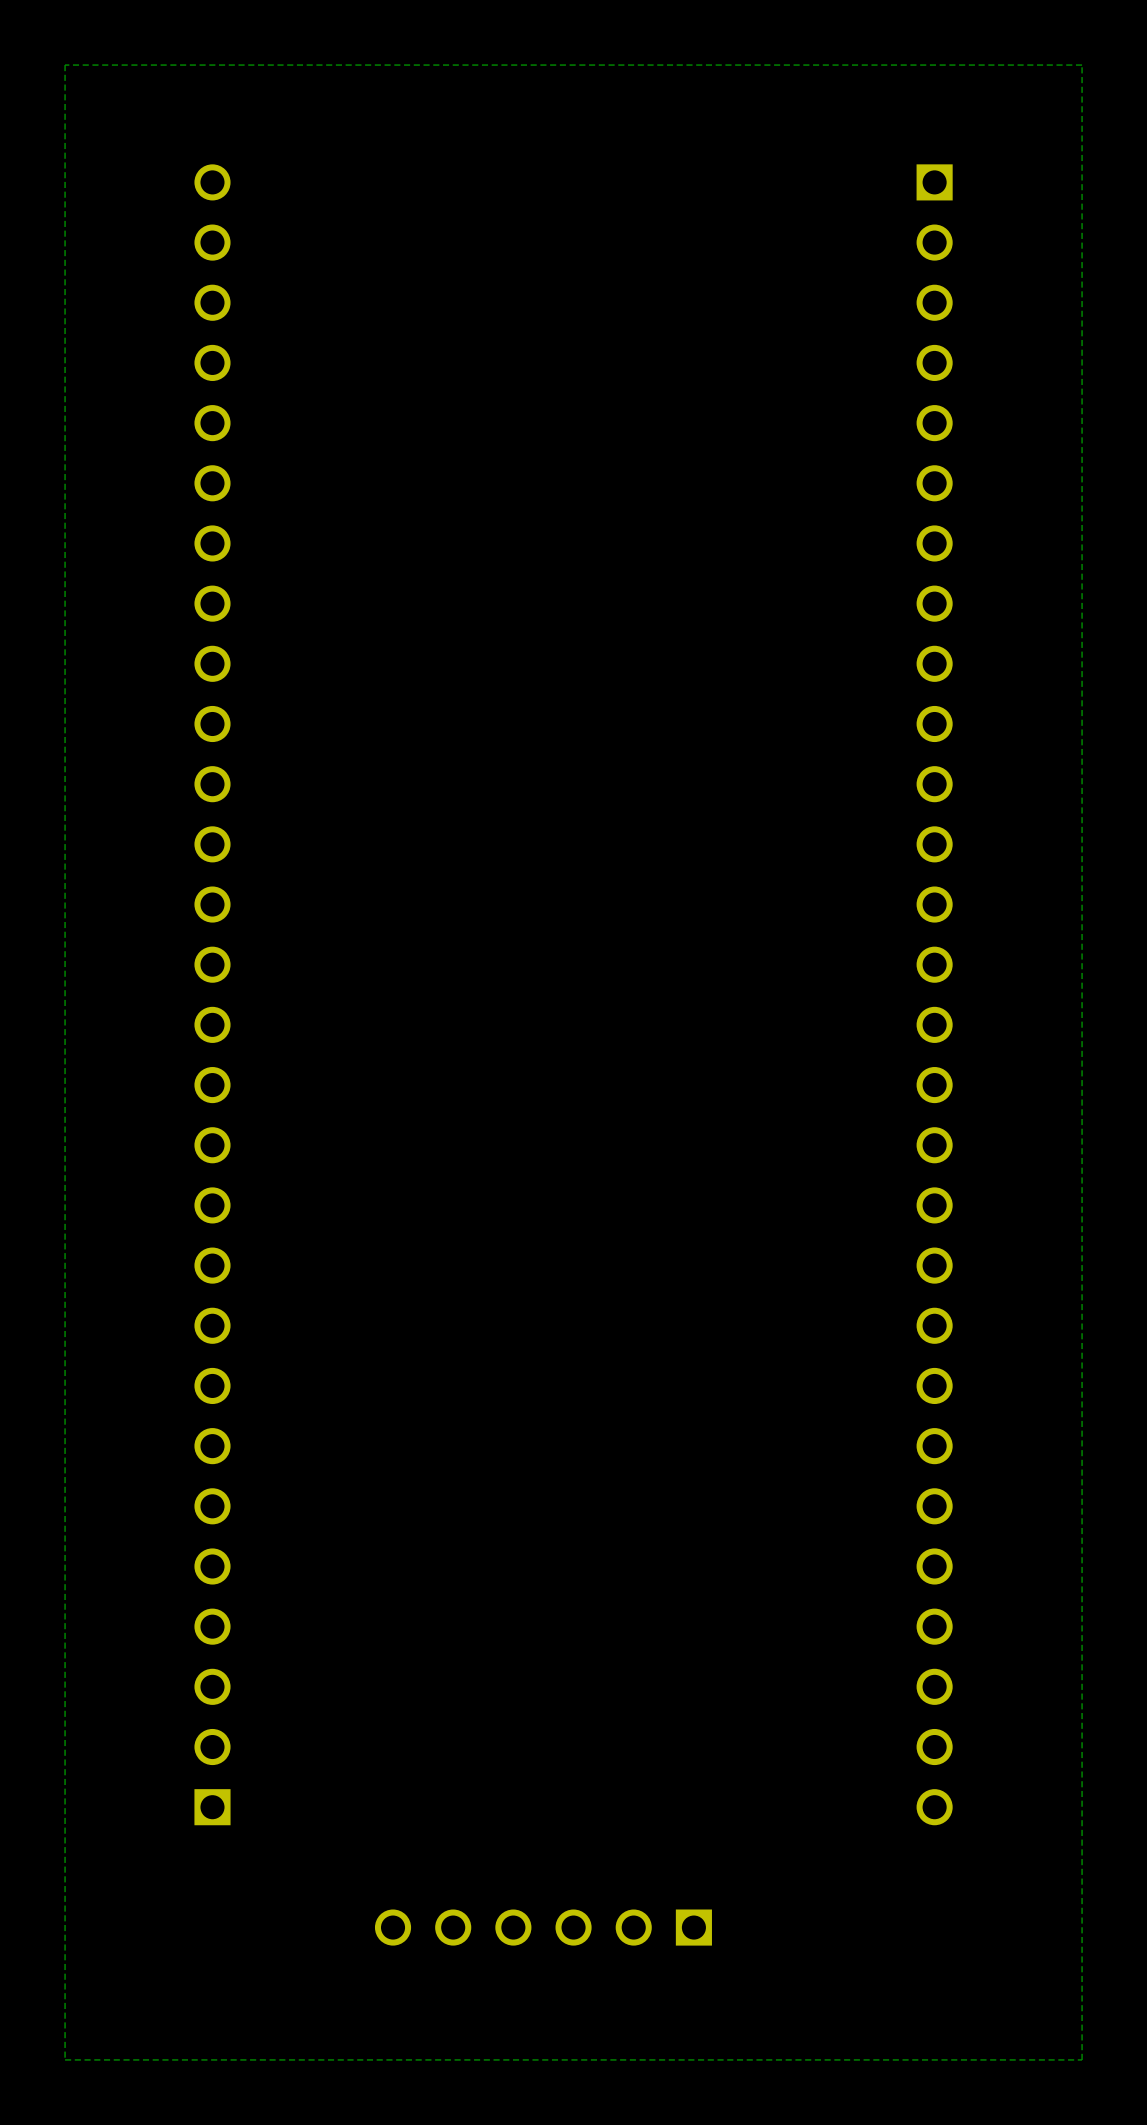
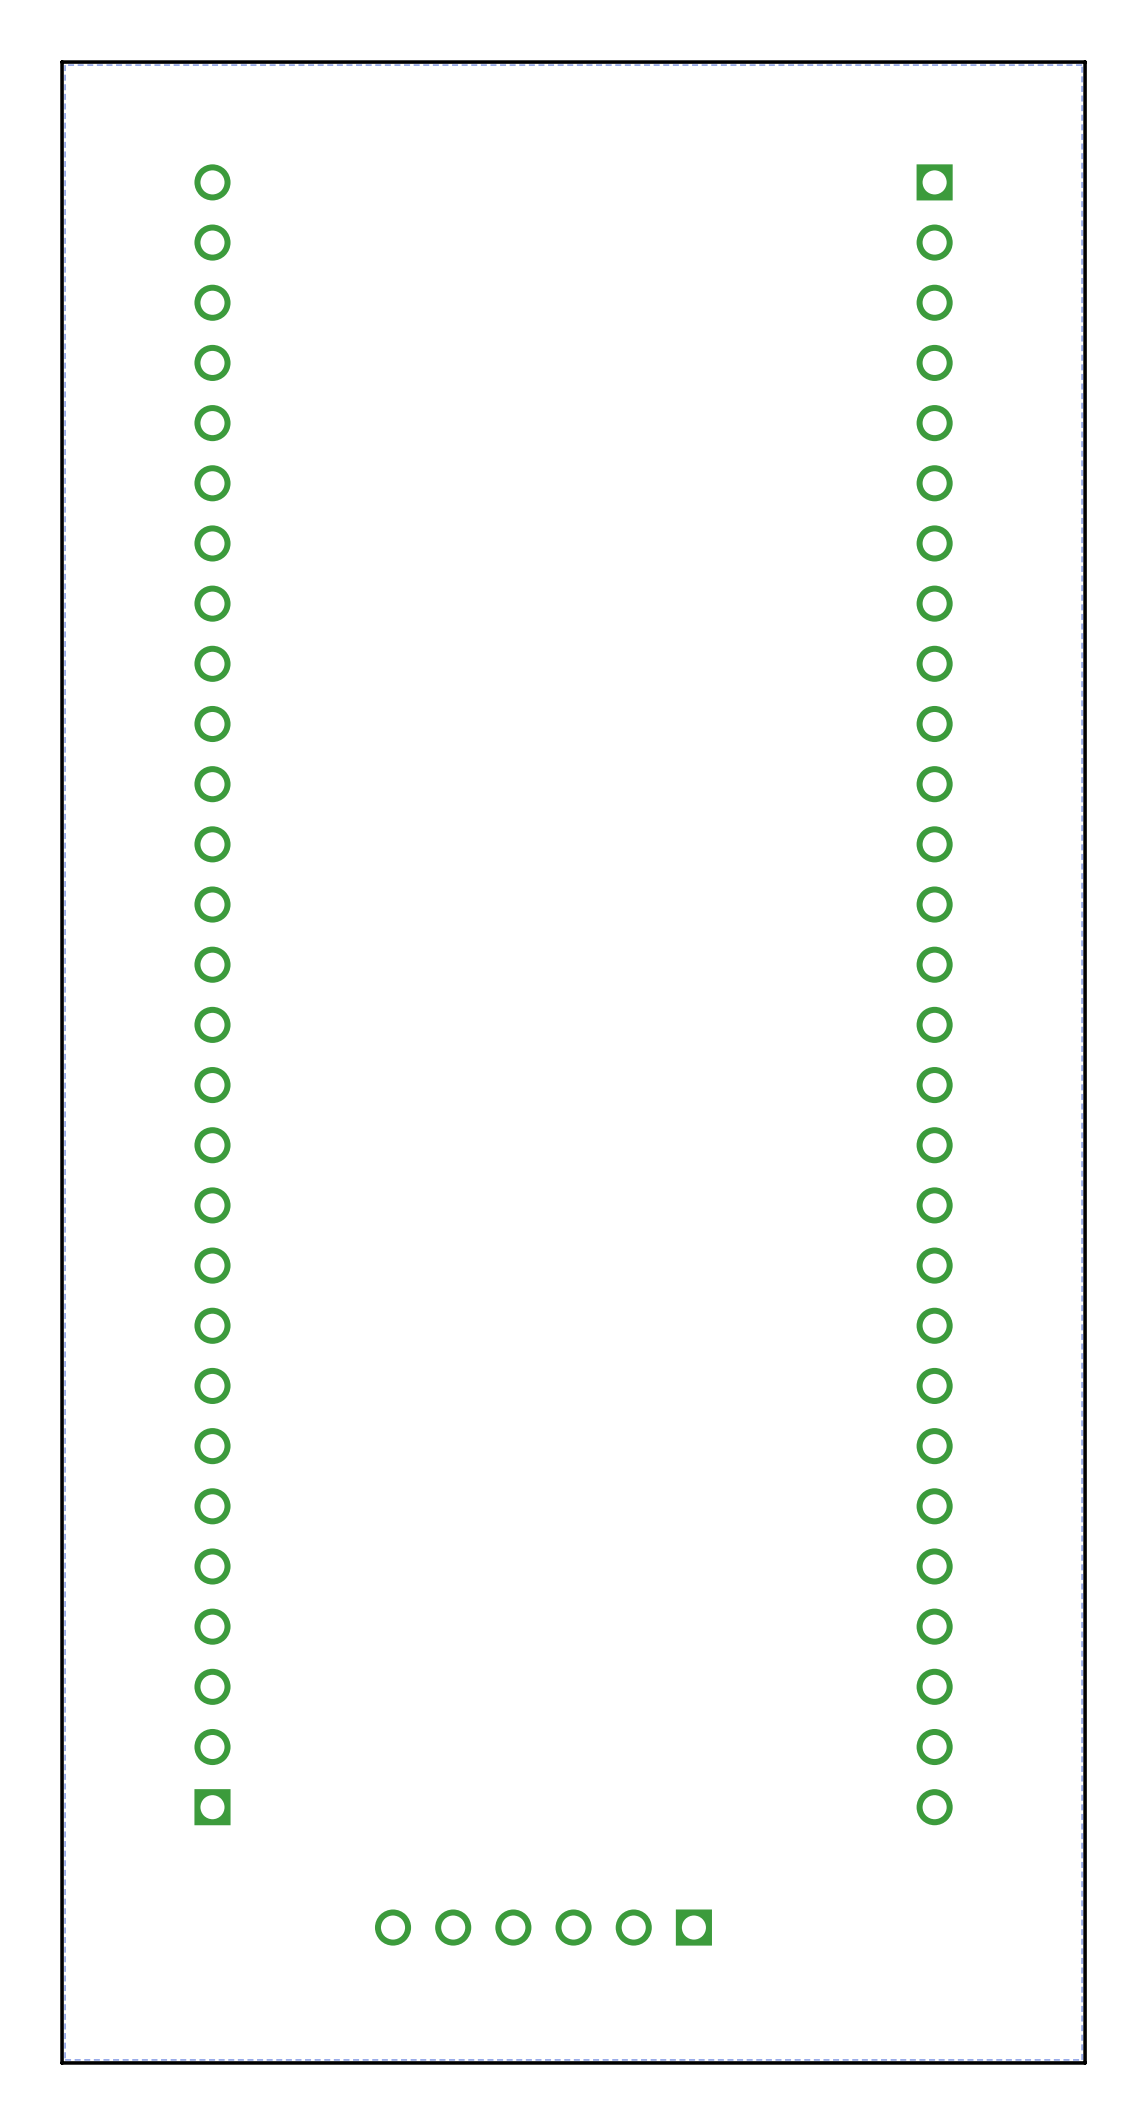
board edge: none -> (1085, 62) (1085, 2062) (62, 2062) (62, 62) (1085, 62)

